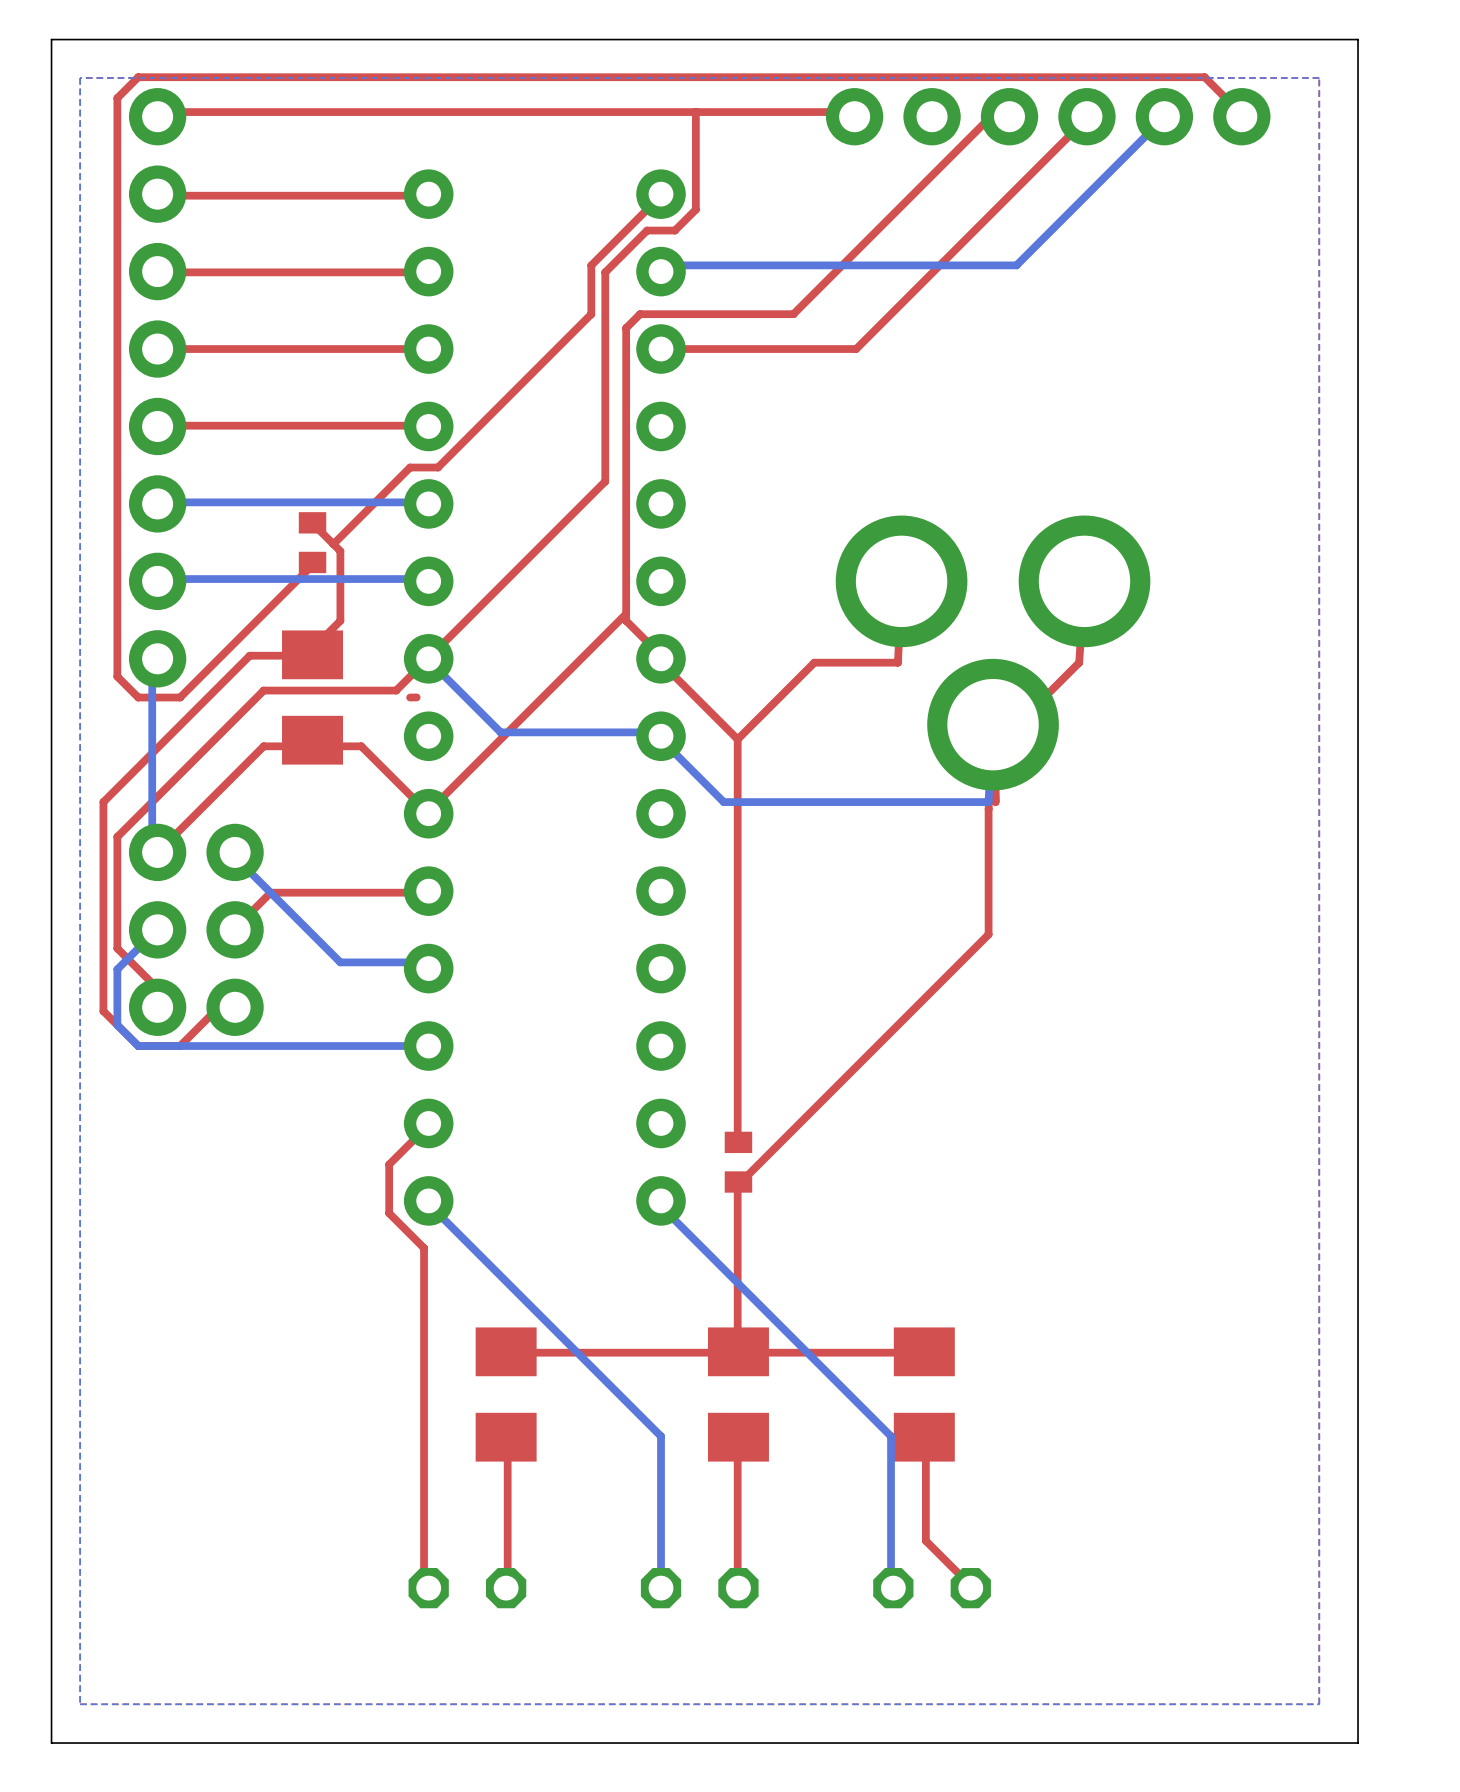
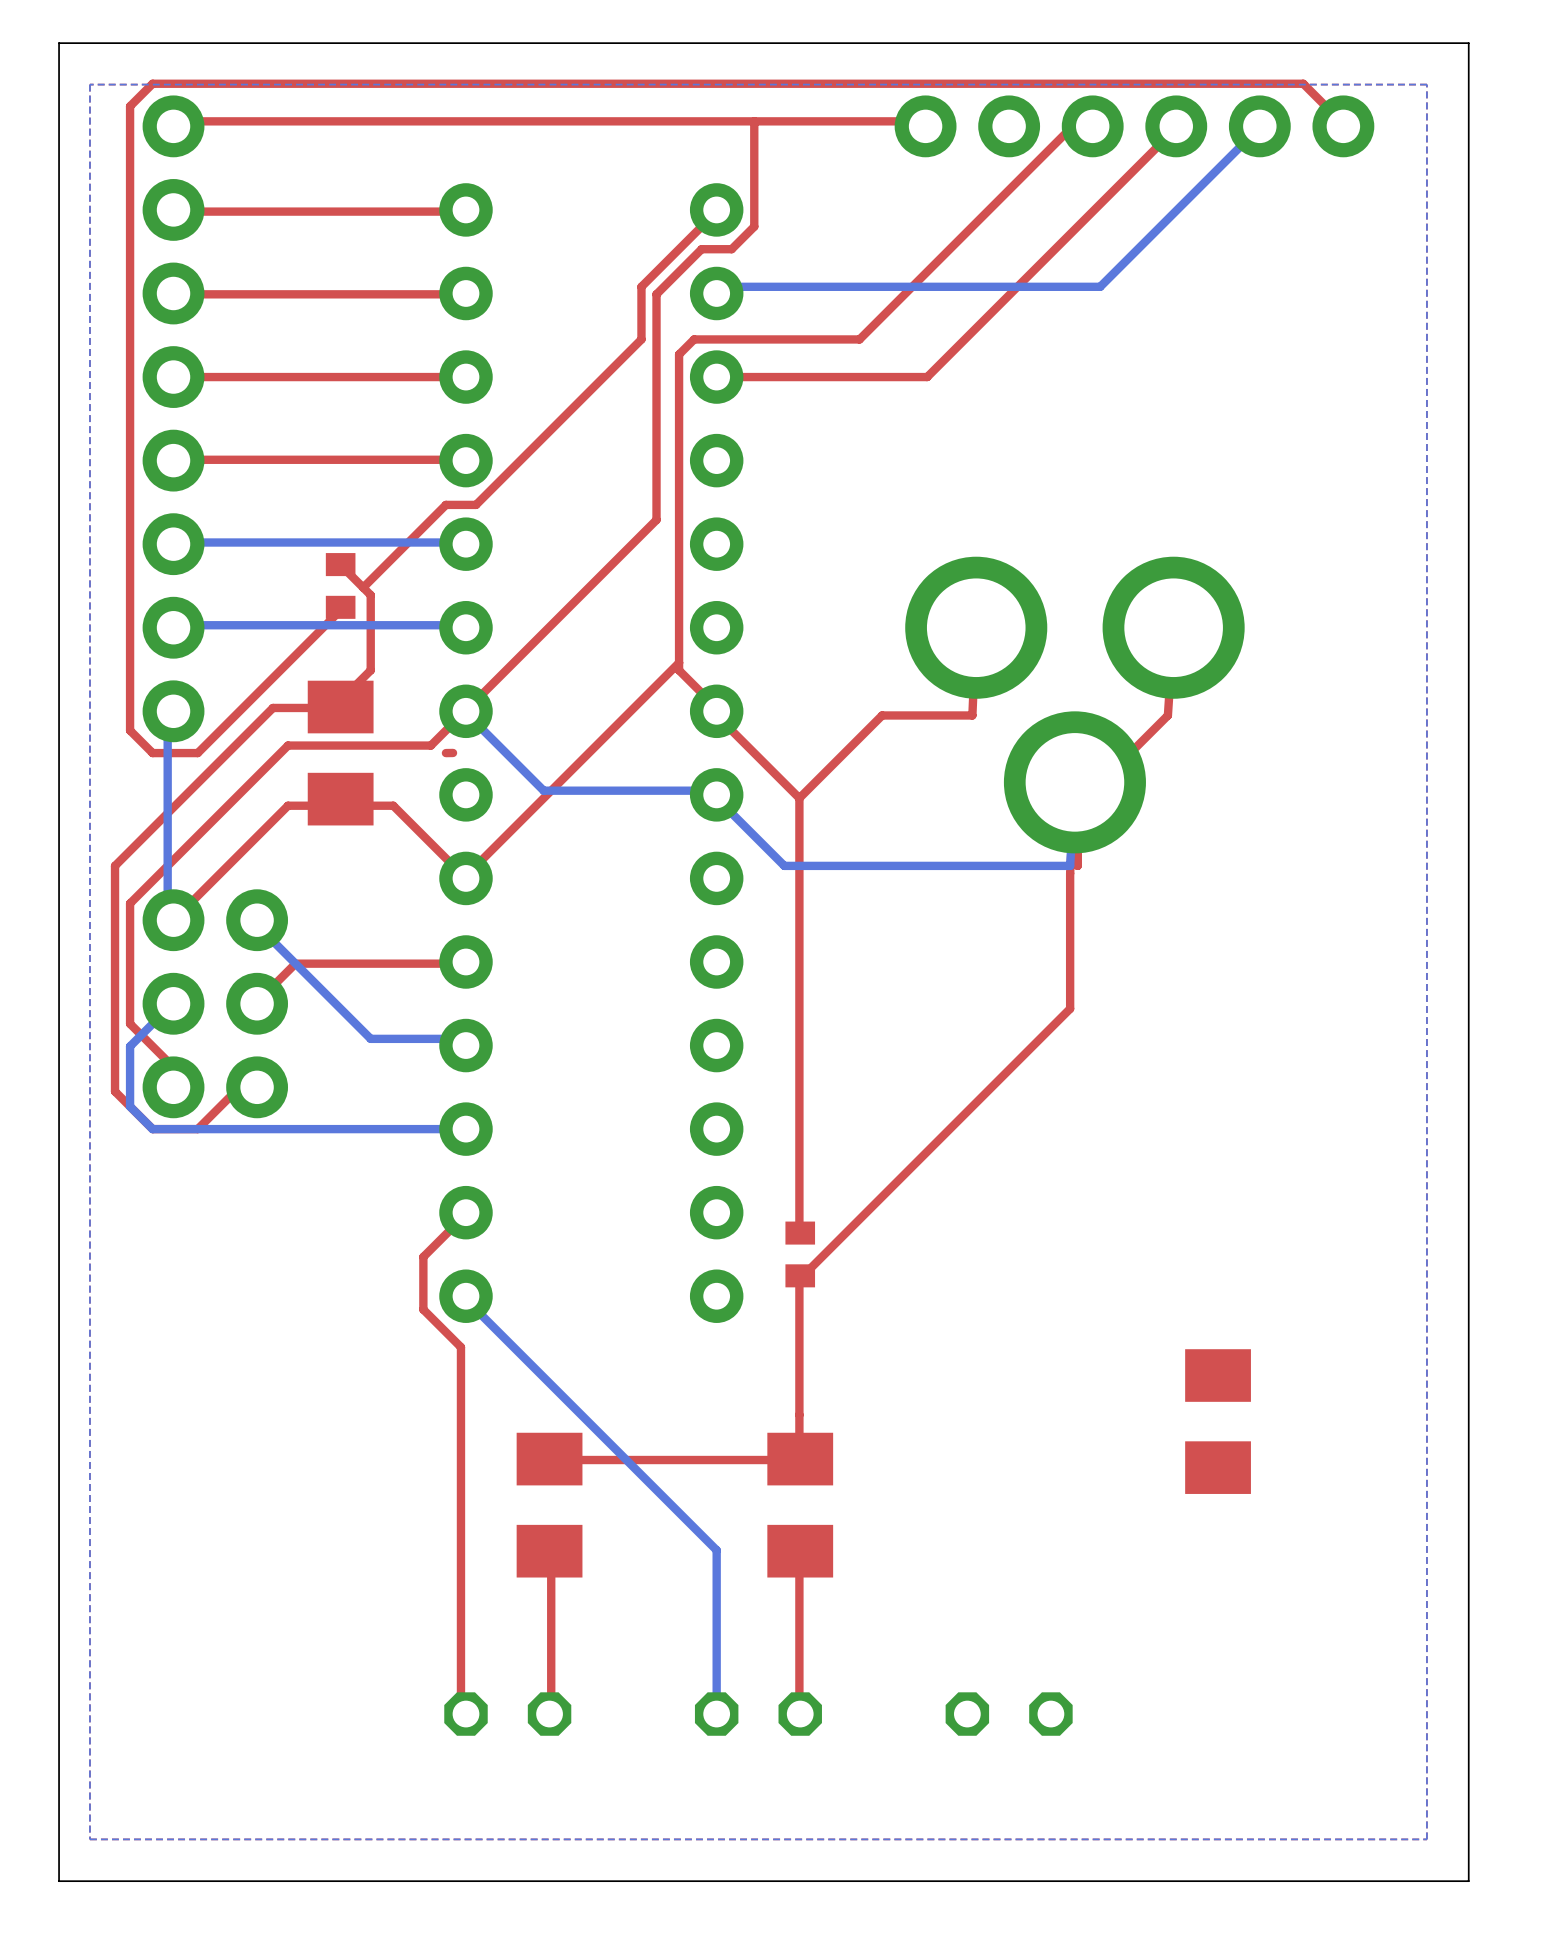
bottom track: (661, 1206) (891, 1436) (891, 1582) (893, 1588) -> none
top track: (924, 1351) (738, 1351) -> none
part position: (924, 1394) -> (1218, 1421)
top track: (924, 1437) (925, 1540) (970, 1588) -> none

